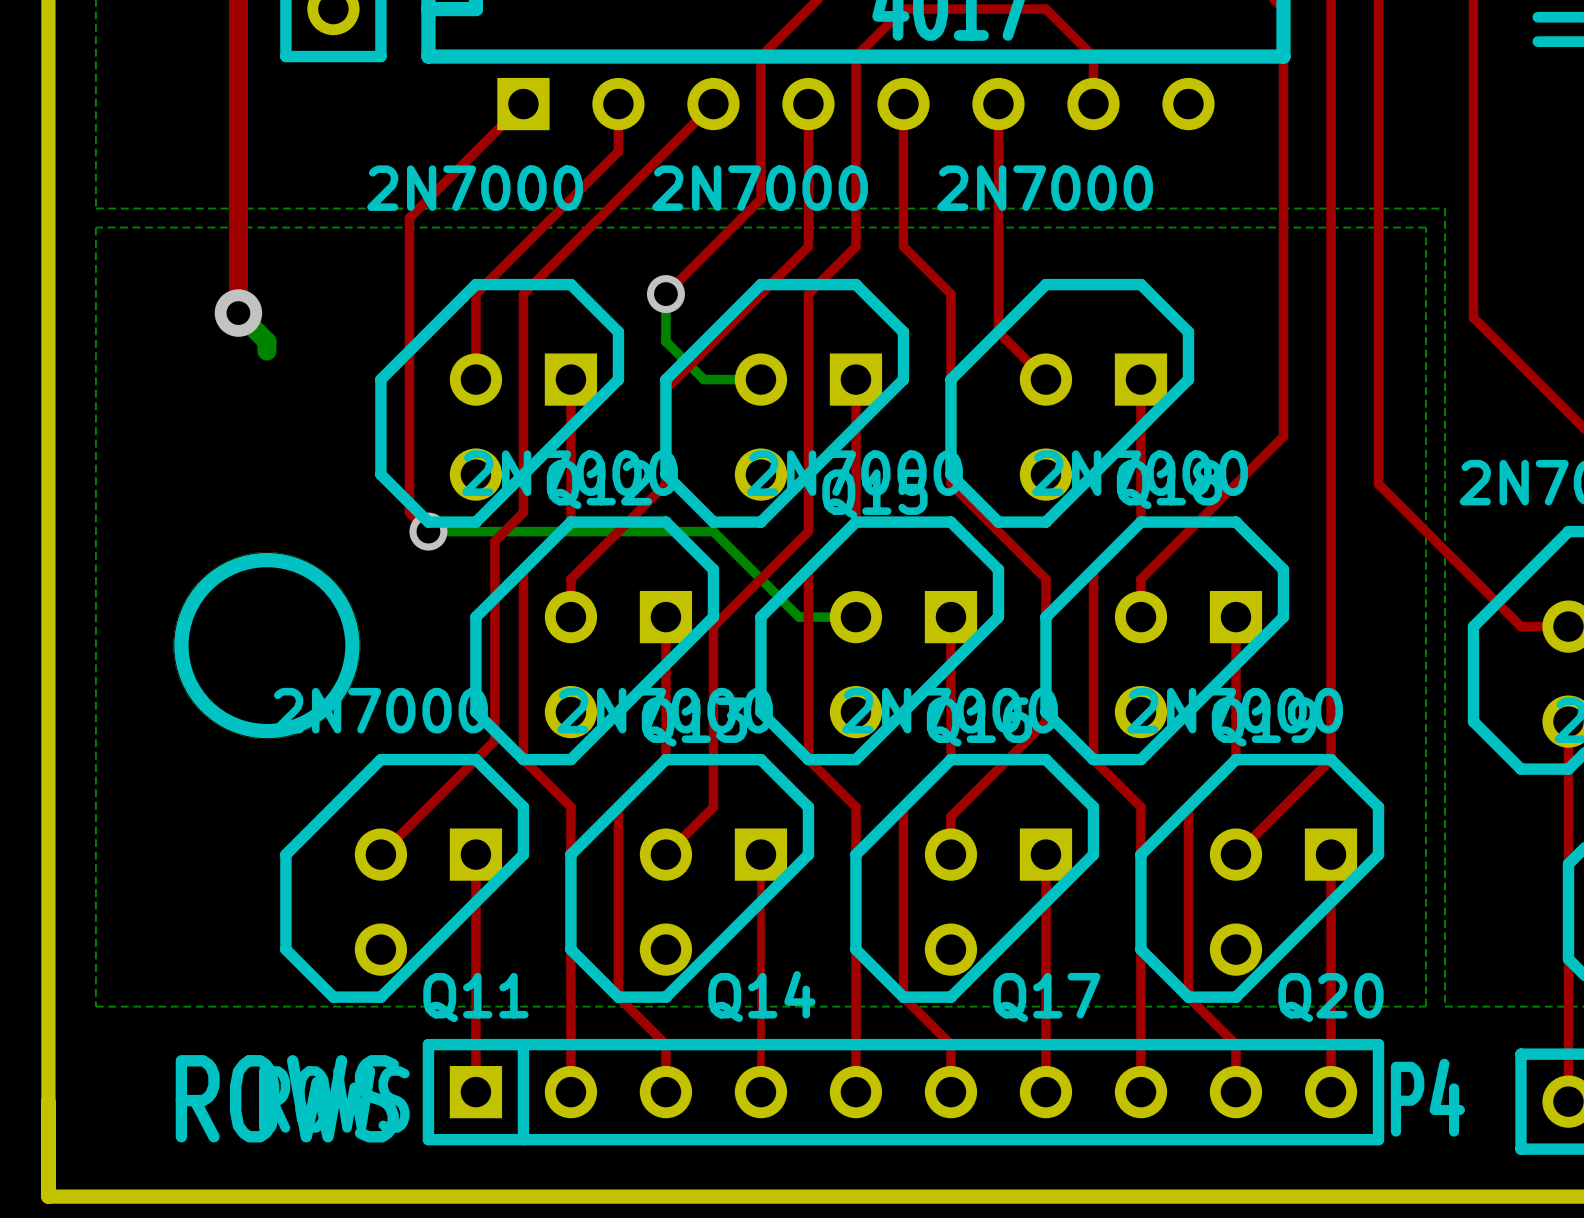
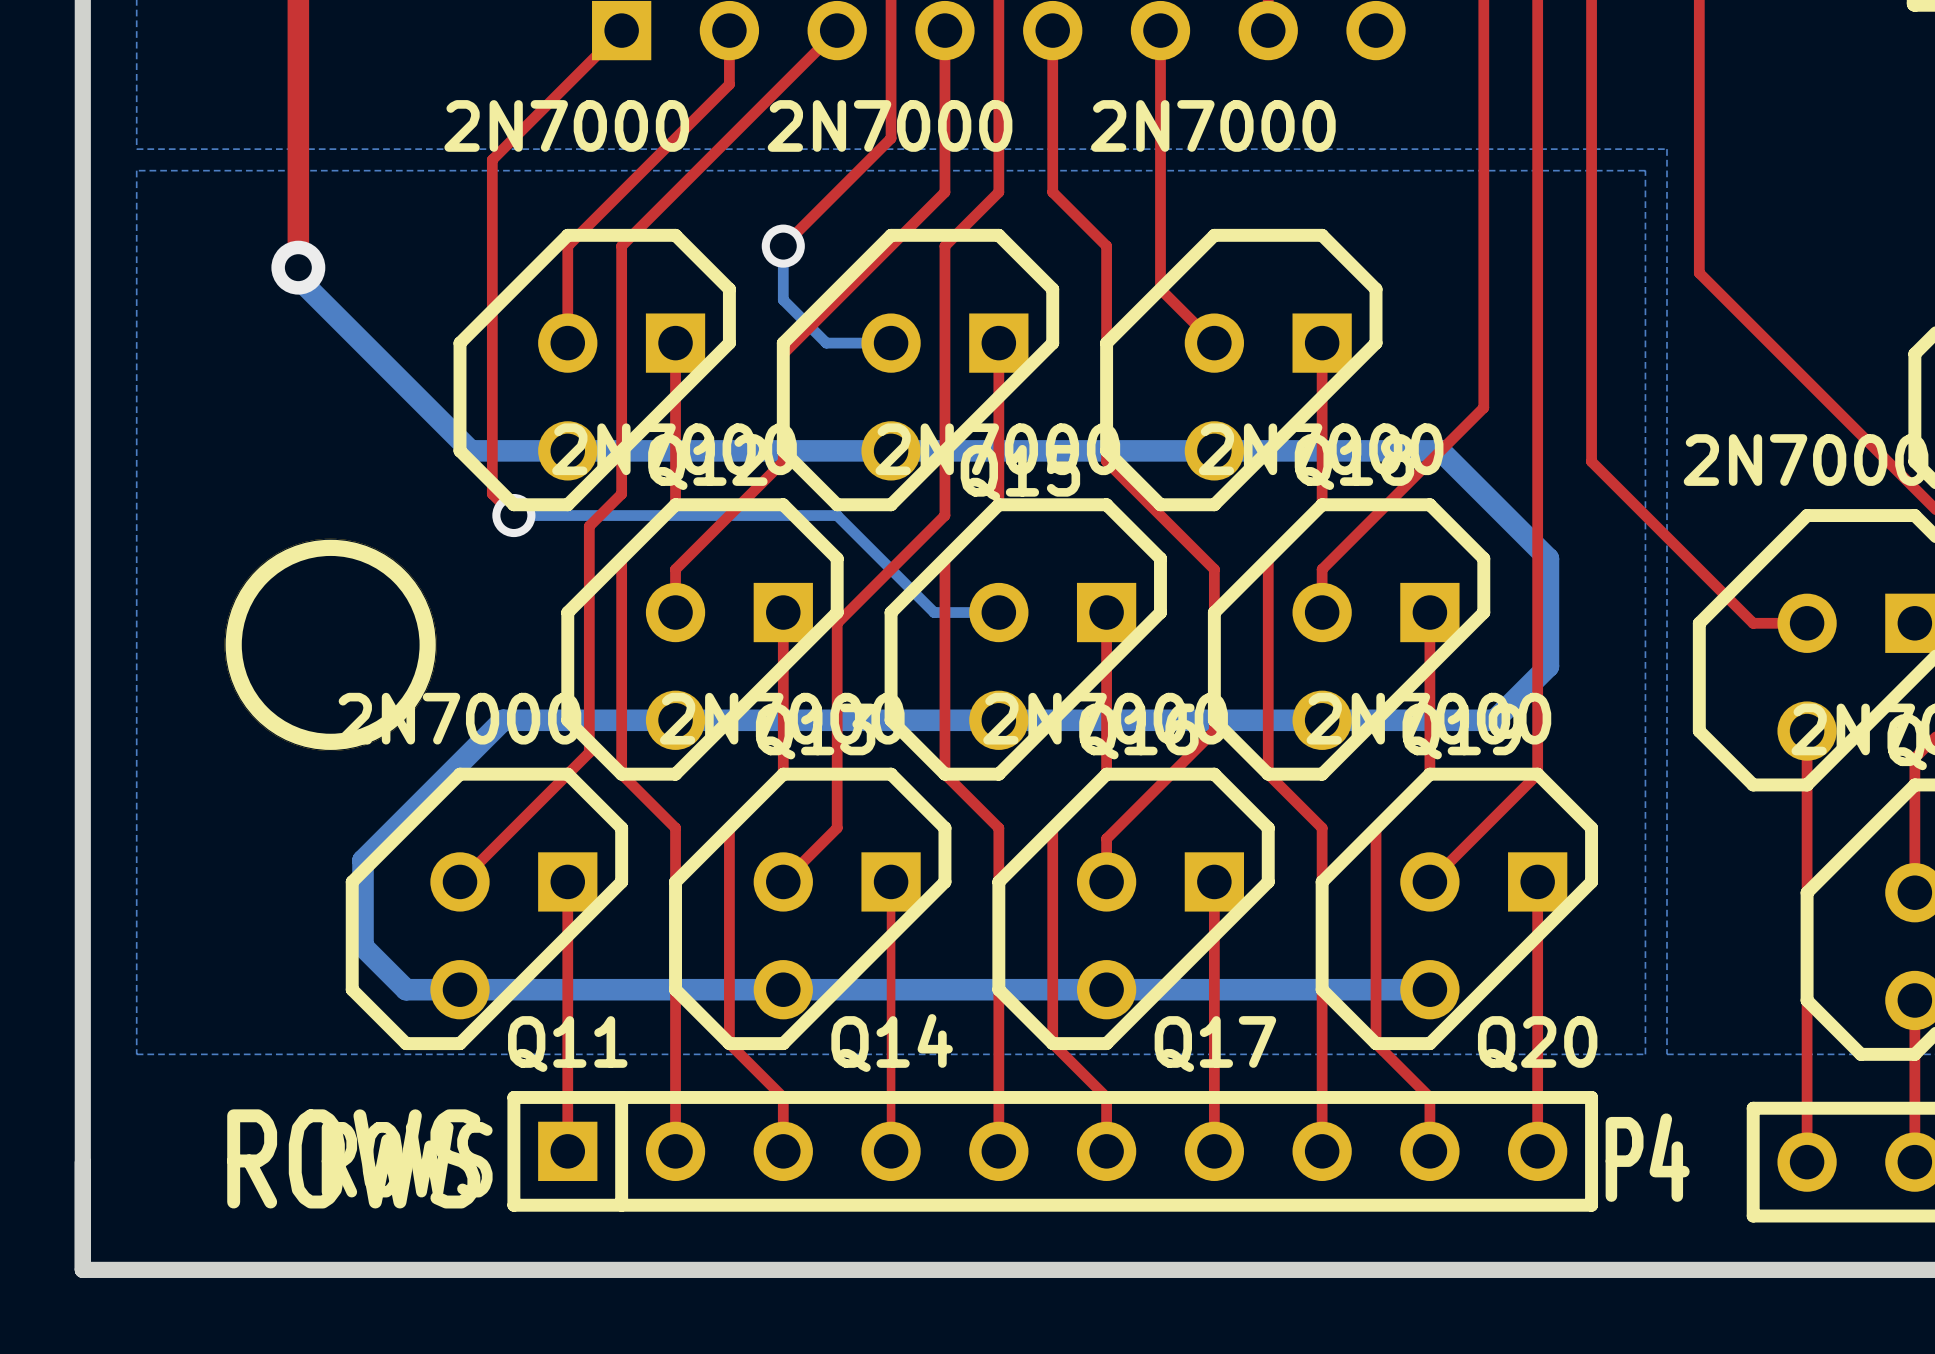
bottom track: (238, 313) (266, 341) (266, 351) -> (298, 267) (298, 278) (470, 450) (1440, 450) (1548, 558) (1548, 666) (1494, 720) (503, 720) (363, 860) (363, 946) (406, 989) (1429, 989)

